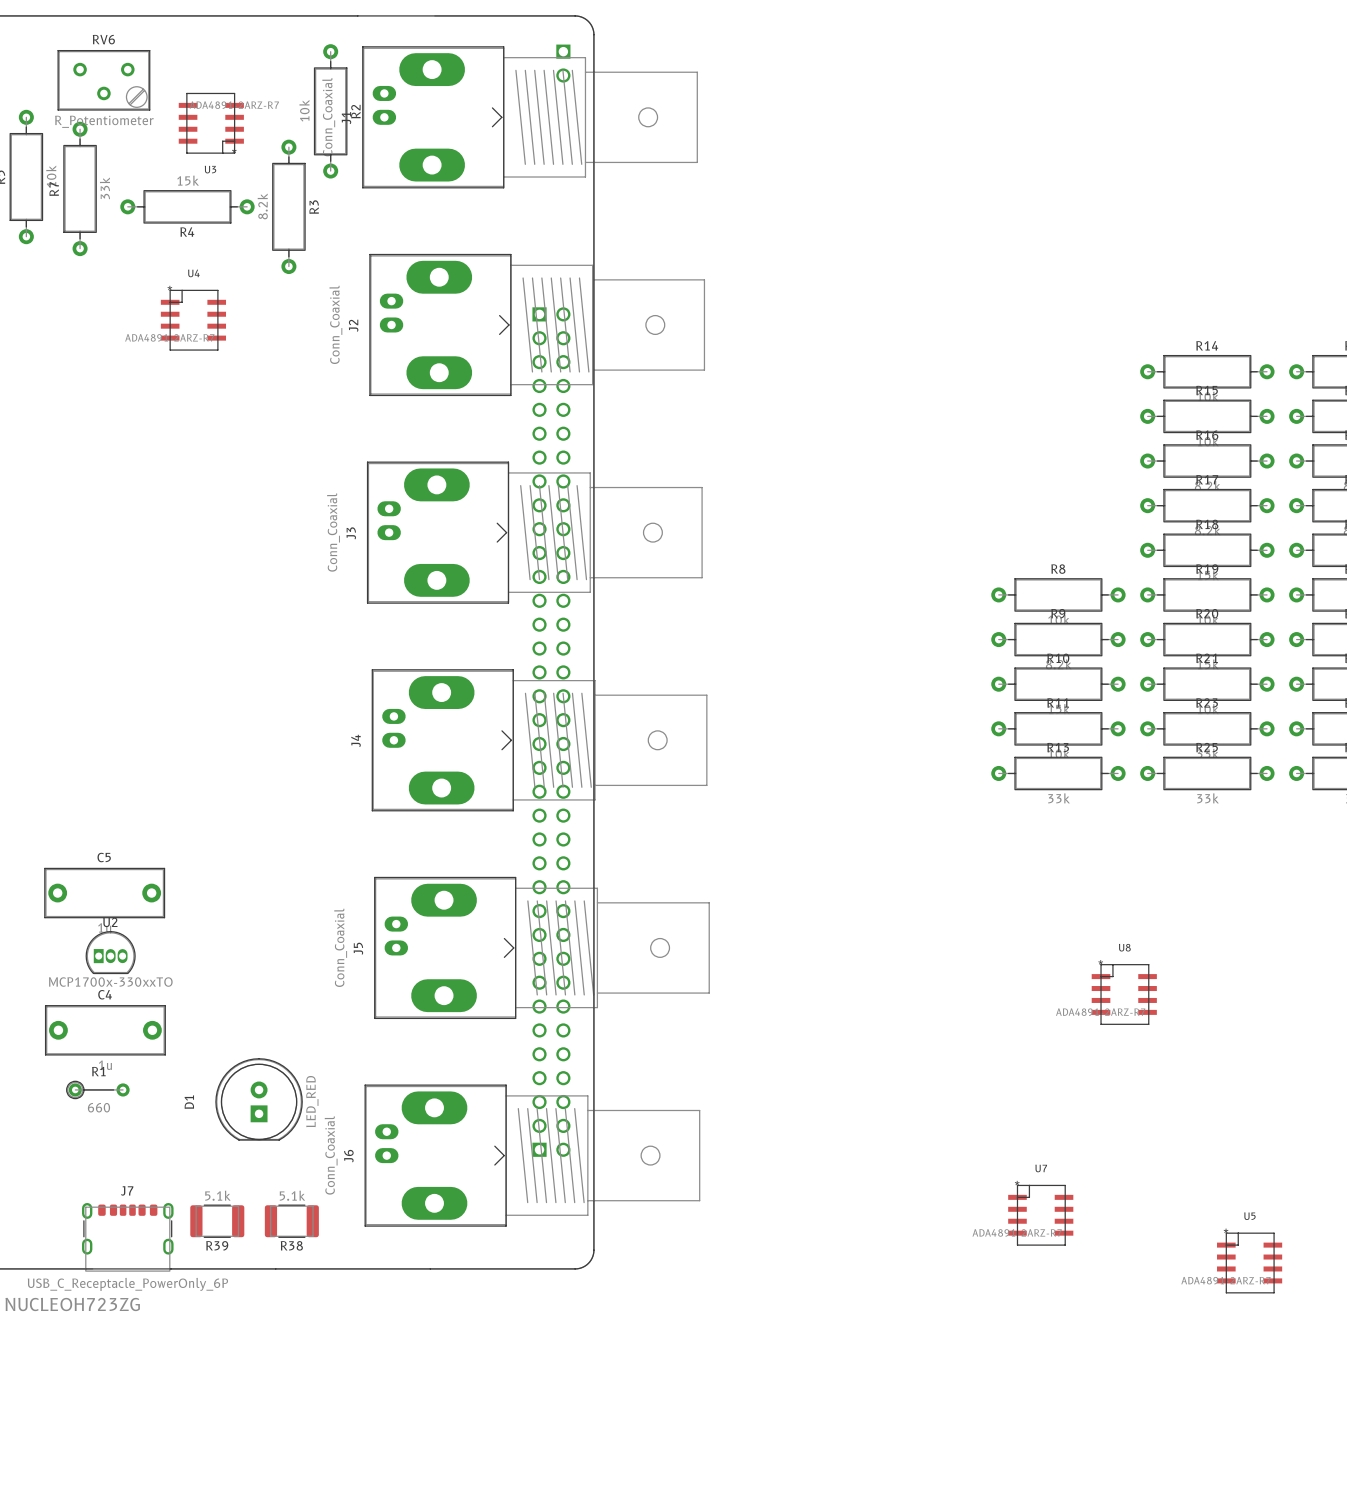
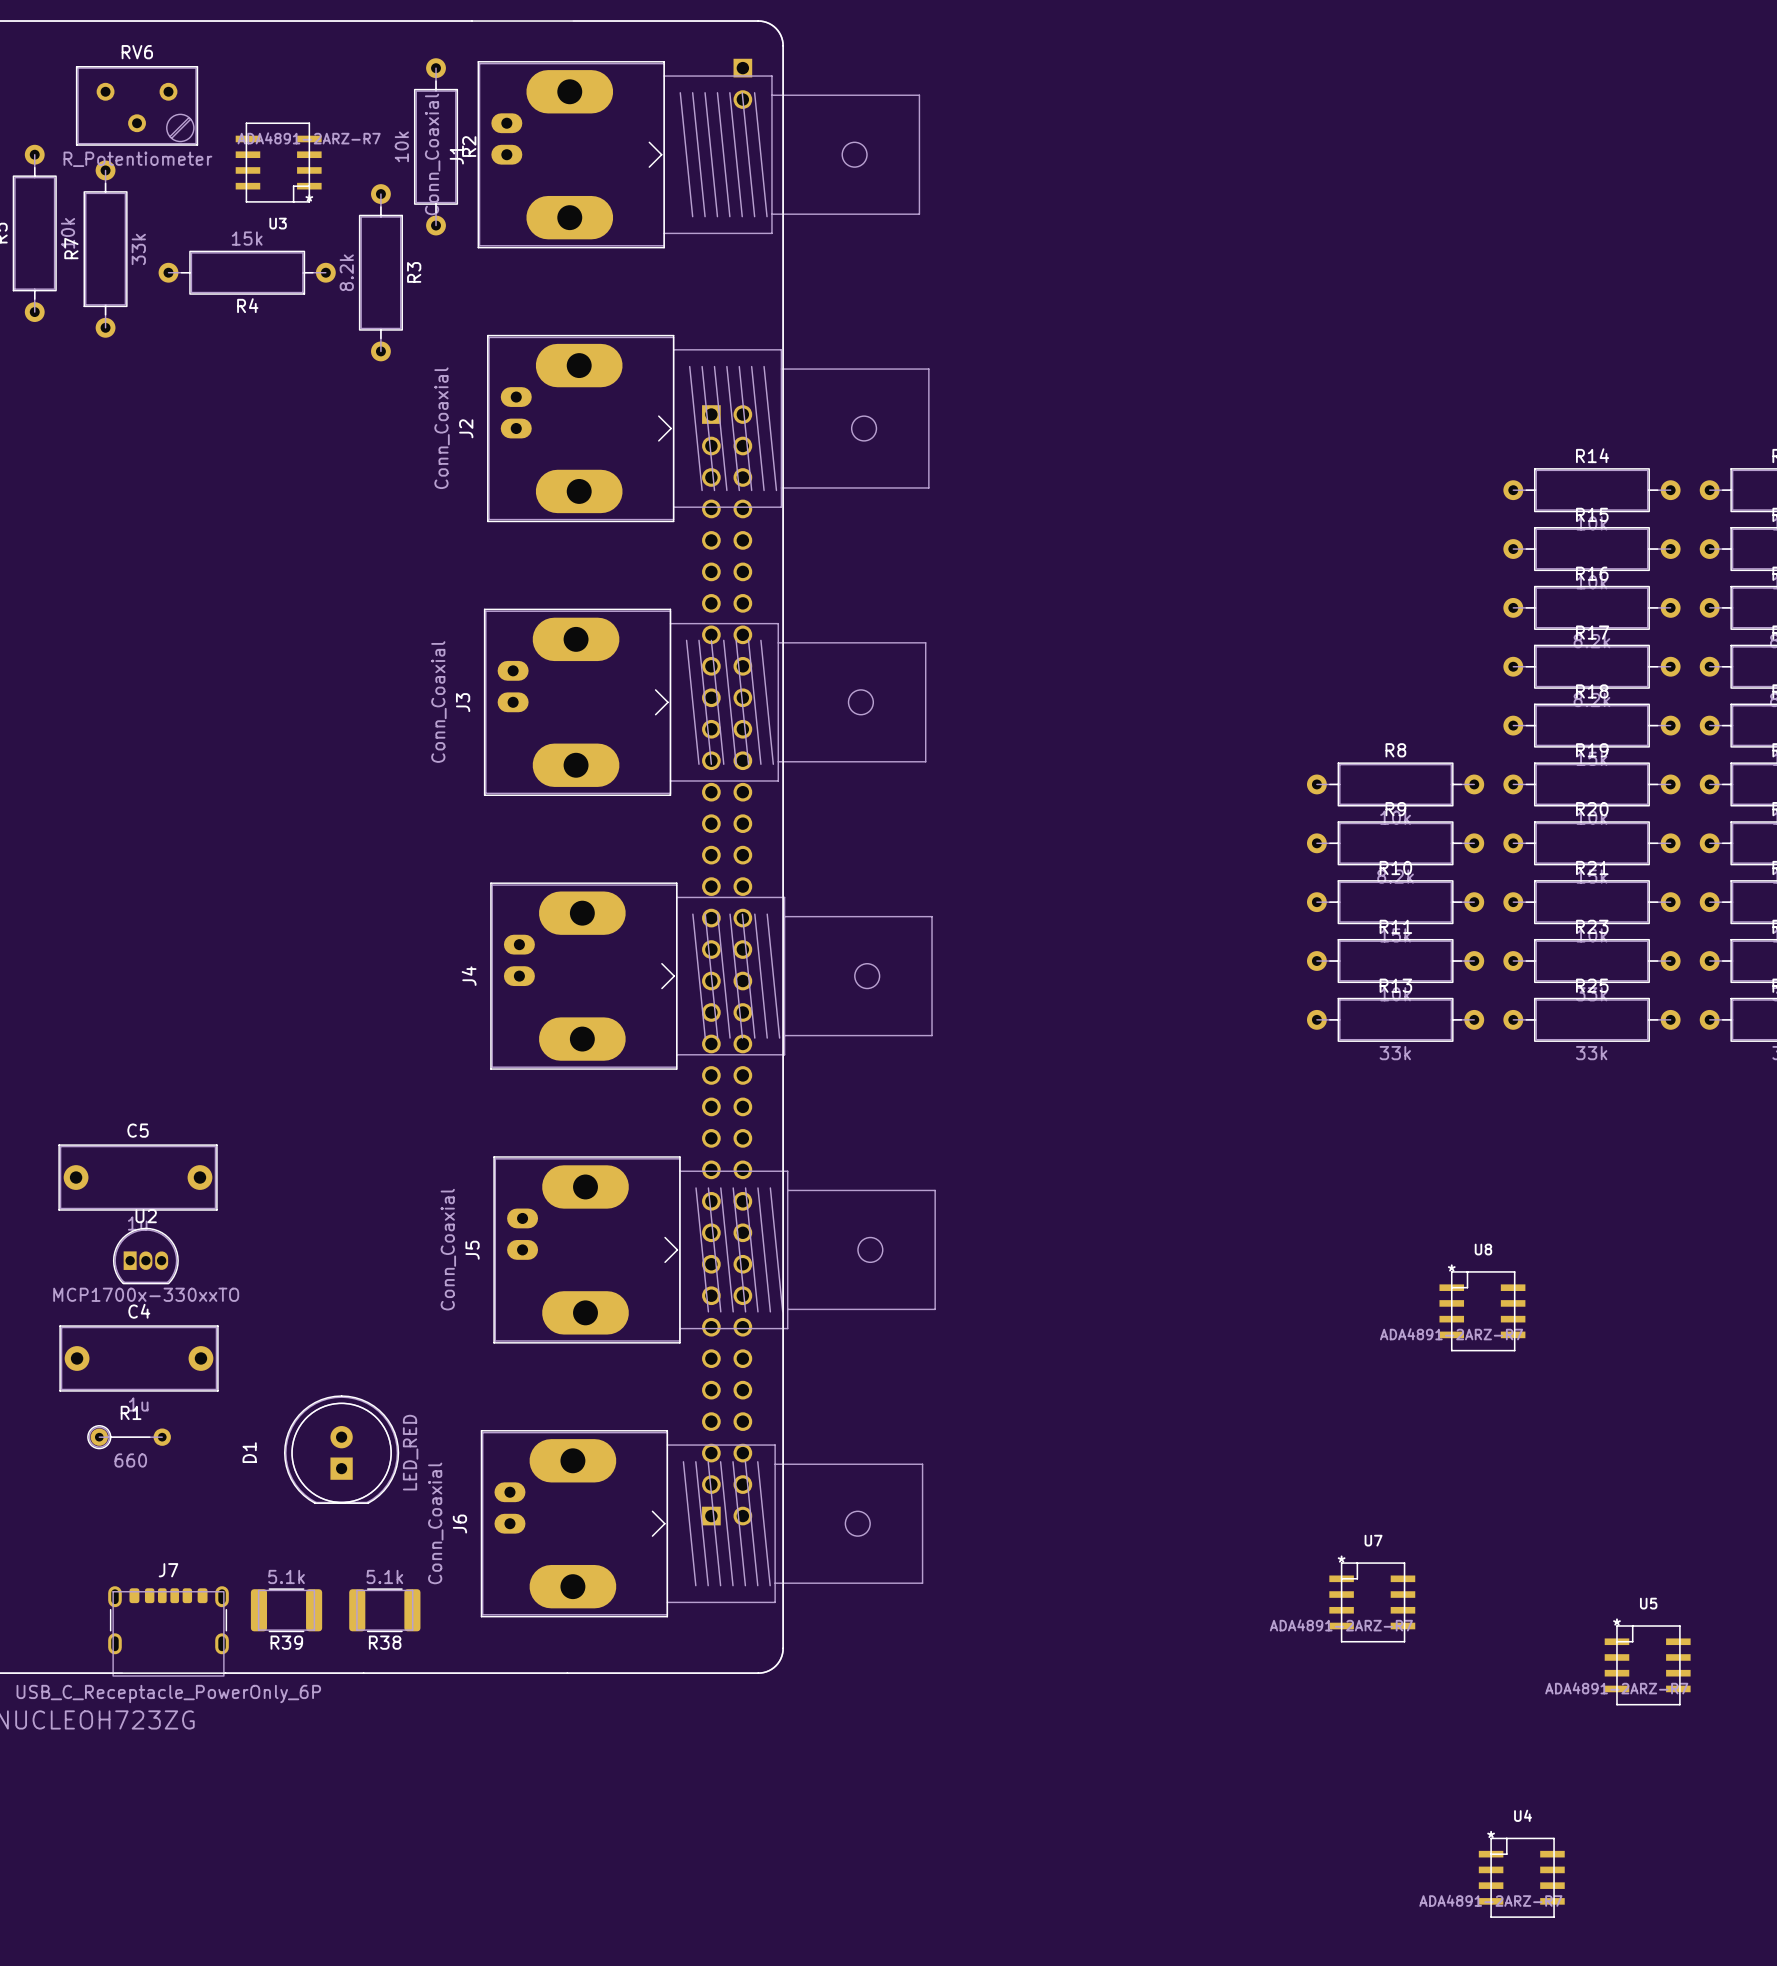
U4 position: (193, 320) -> (1521, 1877)

